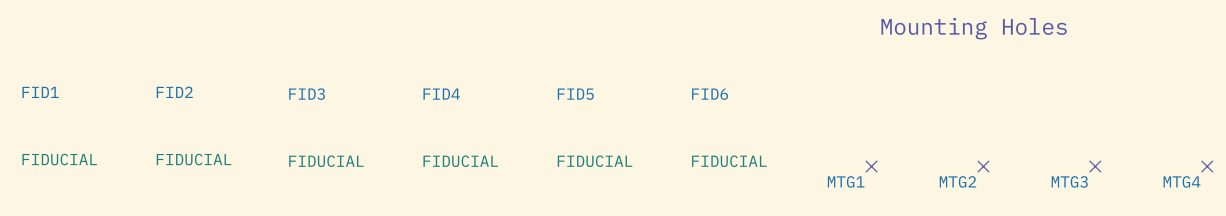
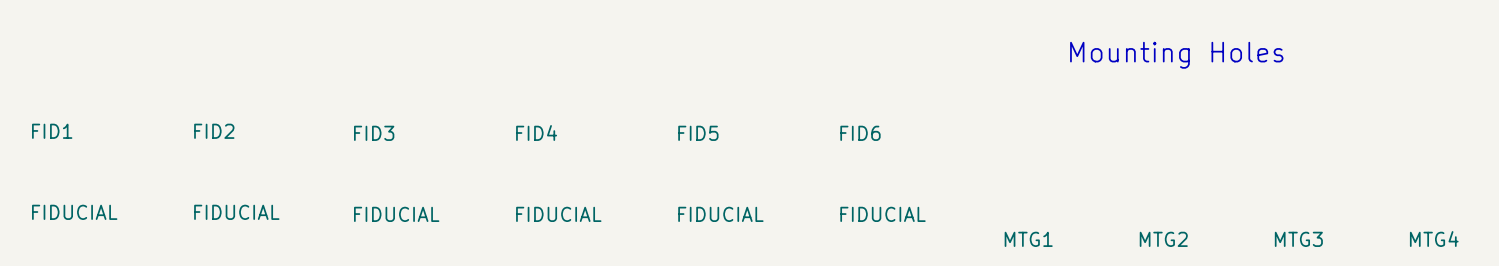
no-connect mark: (871, 166) -> none
no-connect mark: (983, 166) -> none
no-connect mark: (1095, 166) -> none
no-connect mark: (1207, 166) -> none

